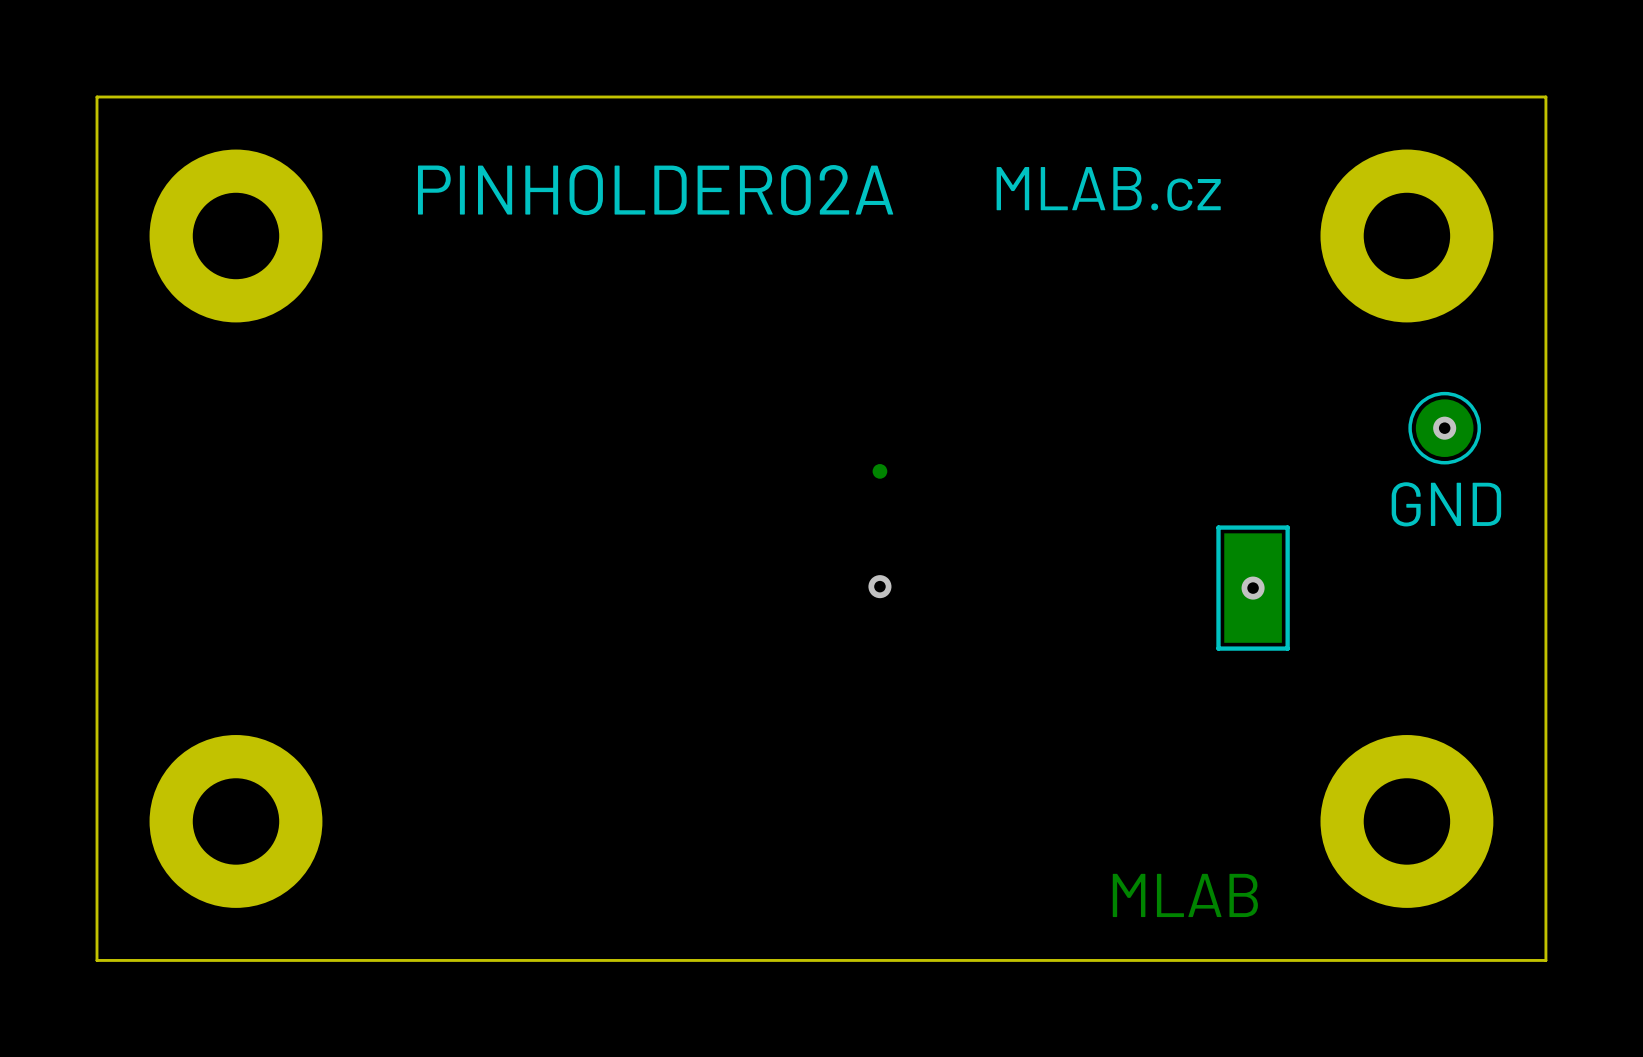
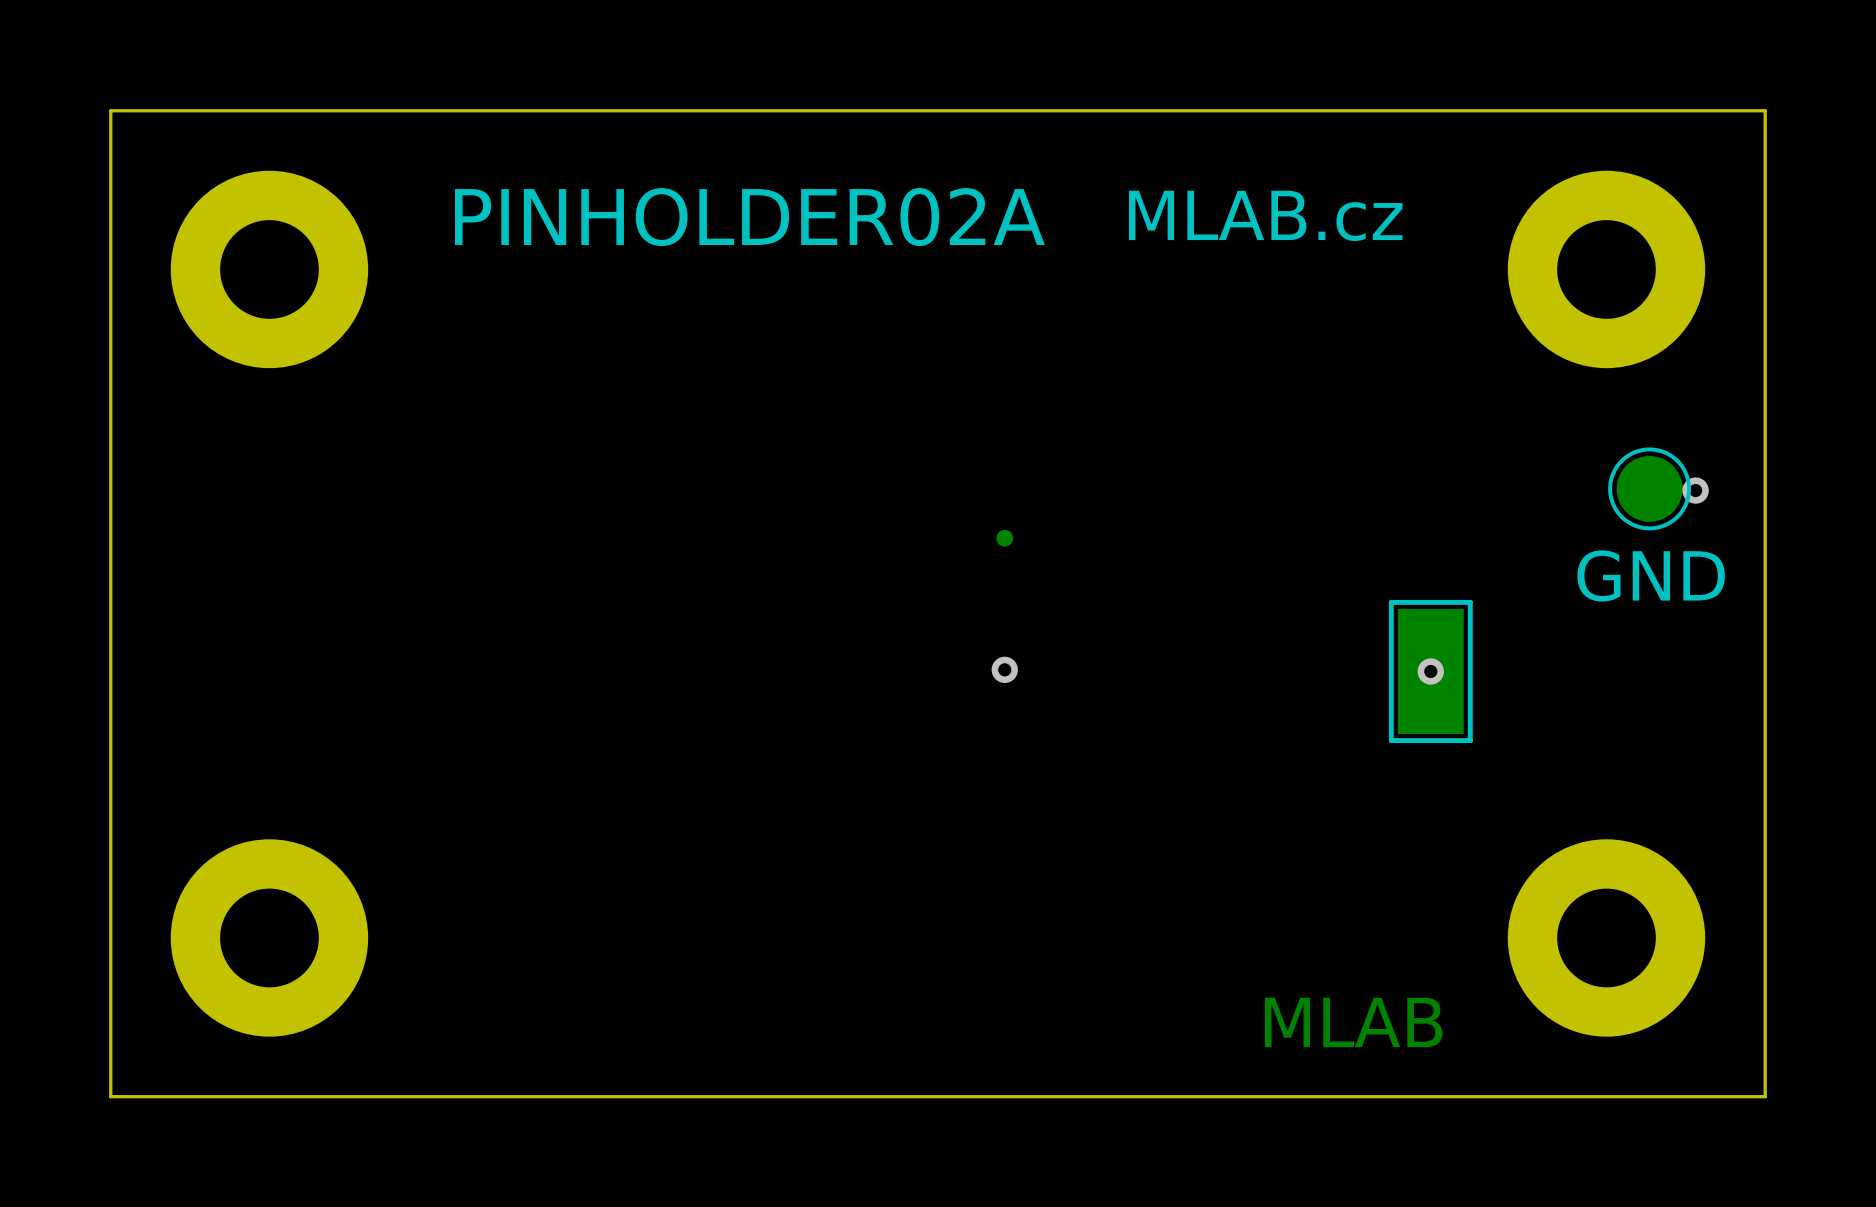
via position: (1444, 428) -> (1695, 490)

